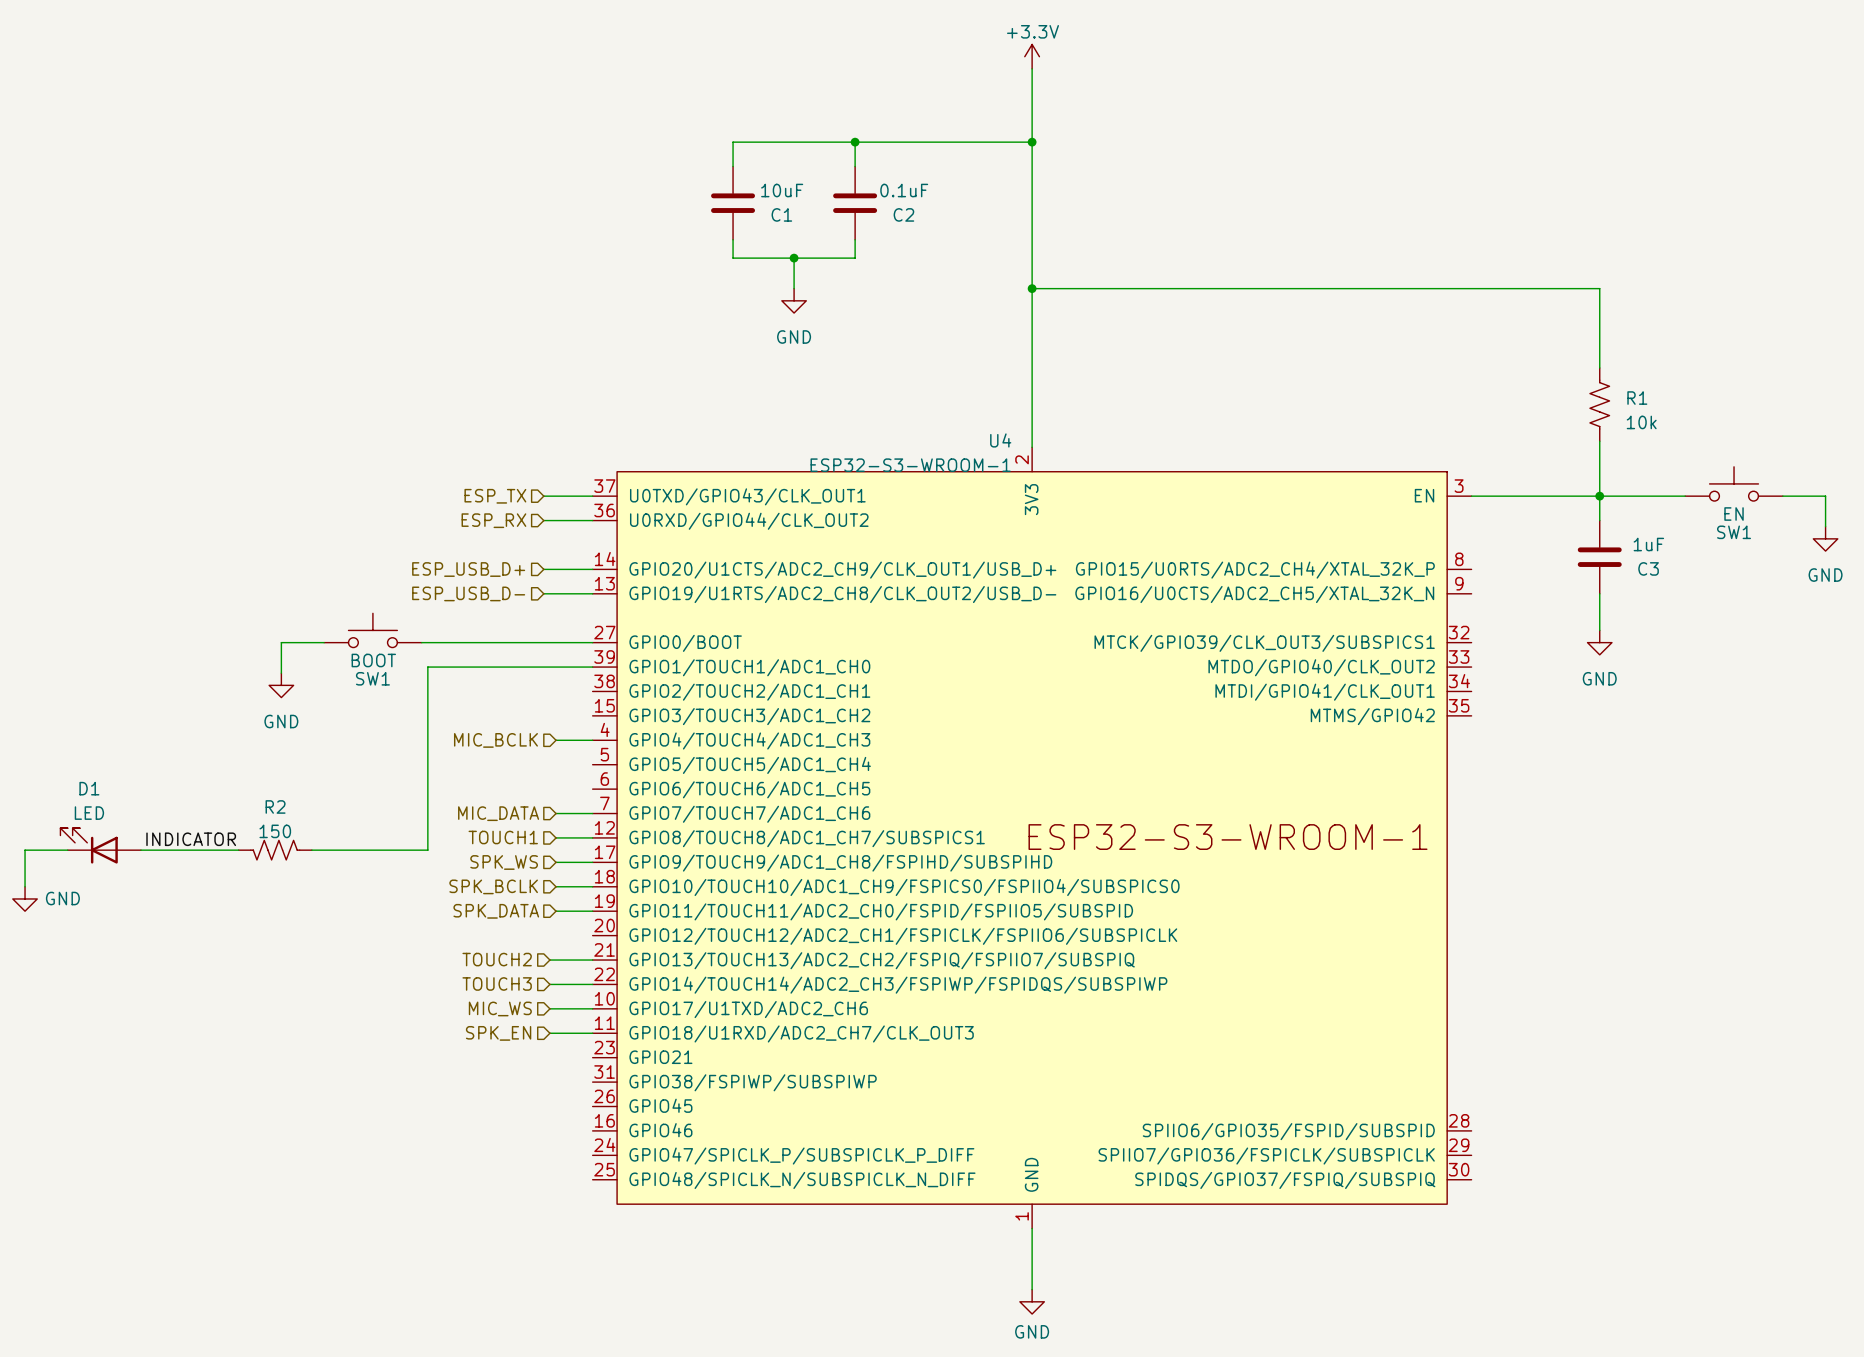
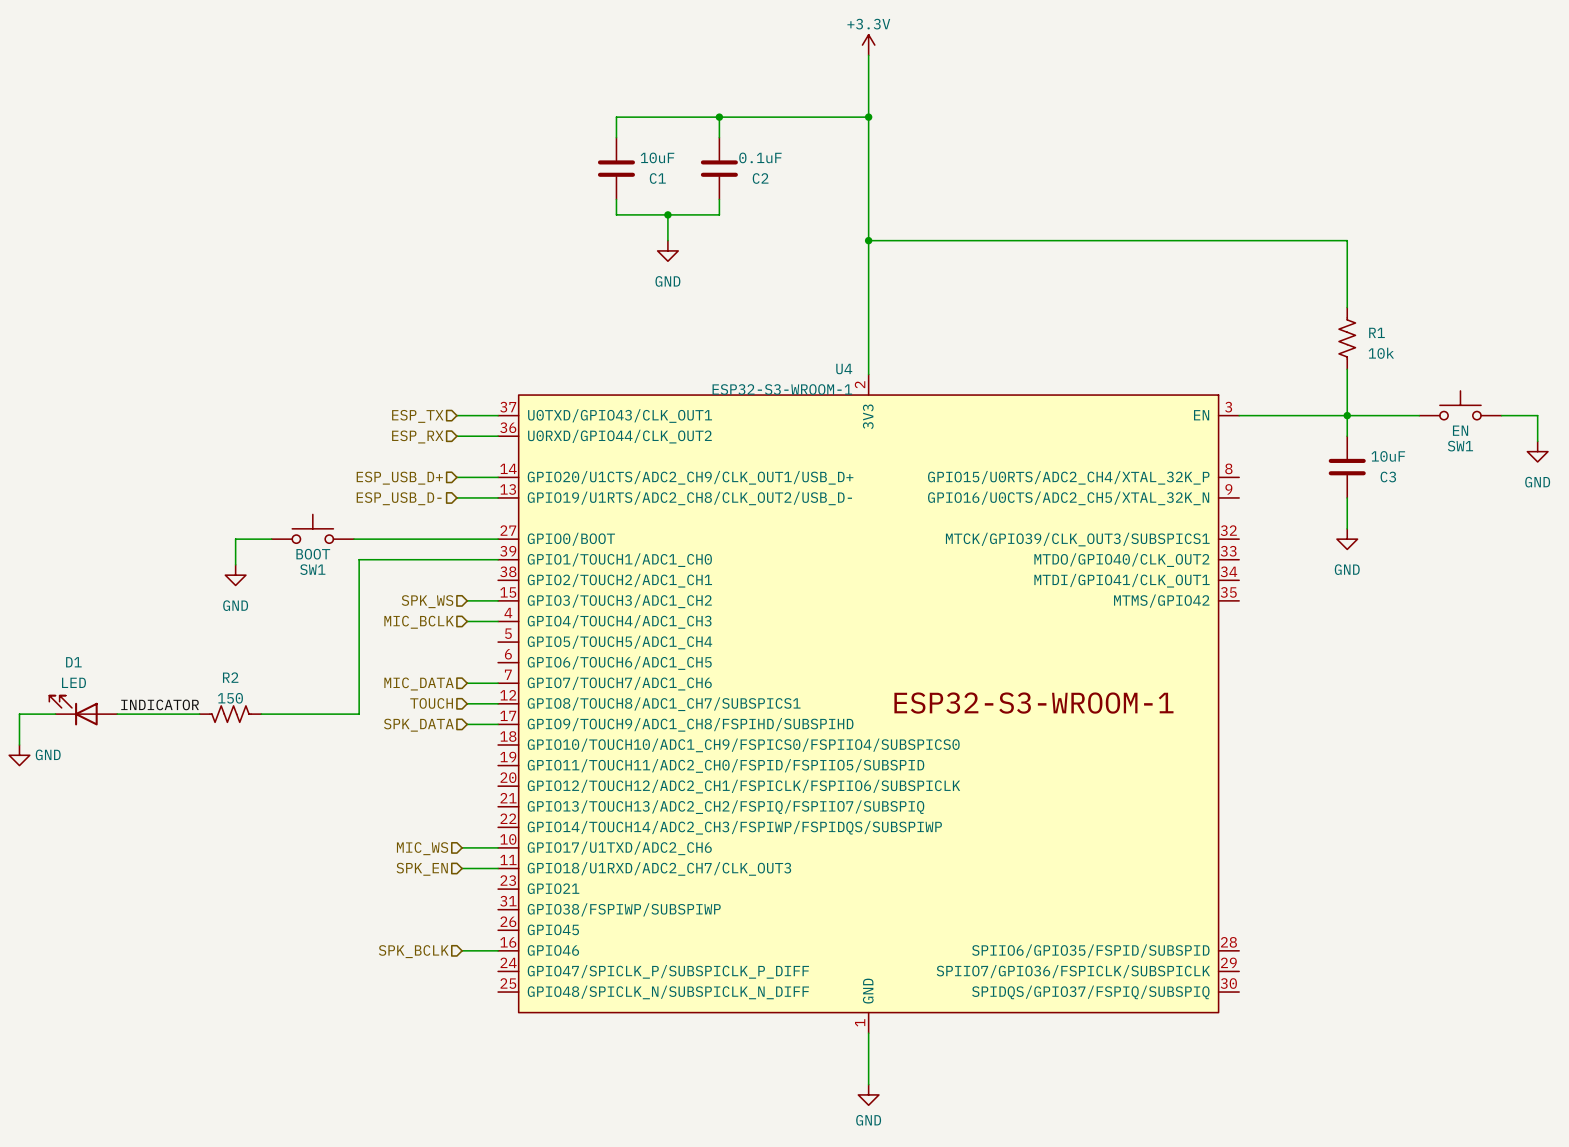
C3 value: 1uF (1648, 544) -> 10uF (1388, 456)
hierarchical label: none -> SPK_WS (427, 601)
hierarchical label: TOUCH1 (503, 837) -> TOUCH (431, 703)
hierarchical label: SPK_WS (504, 862) -> SPK_DATA (418, 725)
hierarchical label: SPK_BCLK (493, 886) -> none
wire: (556, 886) (592, 886) -> (467, 600) (498, 600)
hierarchical label: SPK_DATA (496, 911) -> none
wire: (556, 911) (592, 911) -> none
hierarchical label: TOUCH2 (497, 959) -> none
wire: (549, 960) (592, 960) -> none
hierarchical label: TOUCH3 (497, 983) -> none
wire: (549, 984) (592, 984) -> (462, 950) (498, 950)
hierarchical label: none -> SPK_BCLK (413, 951)

